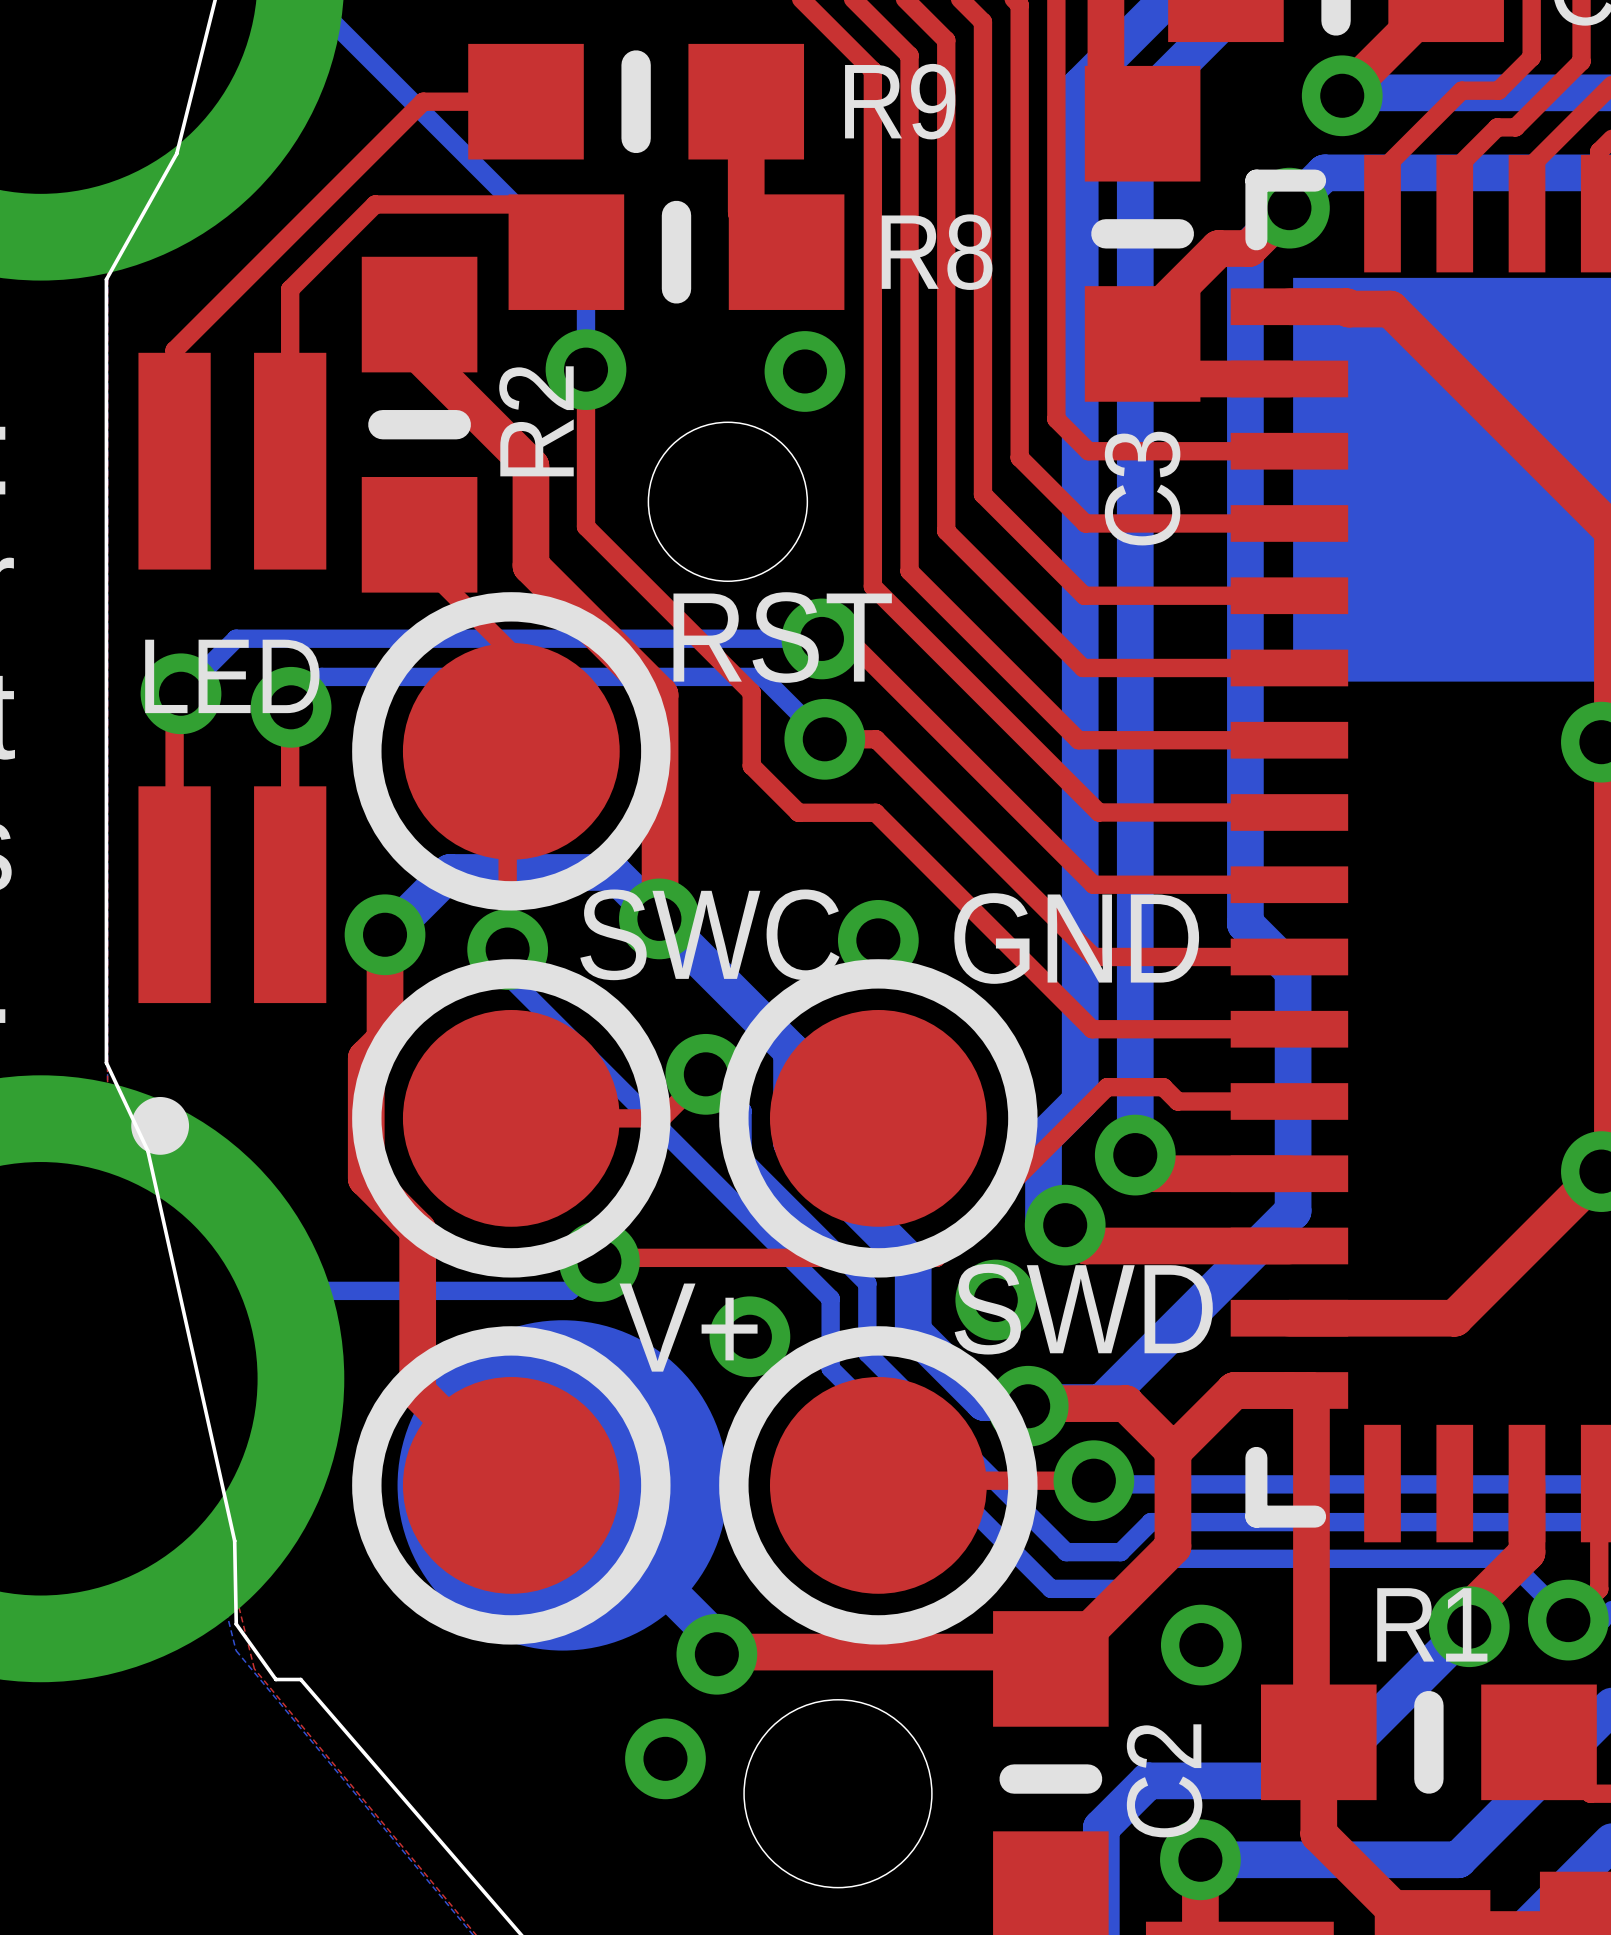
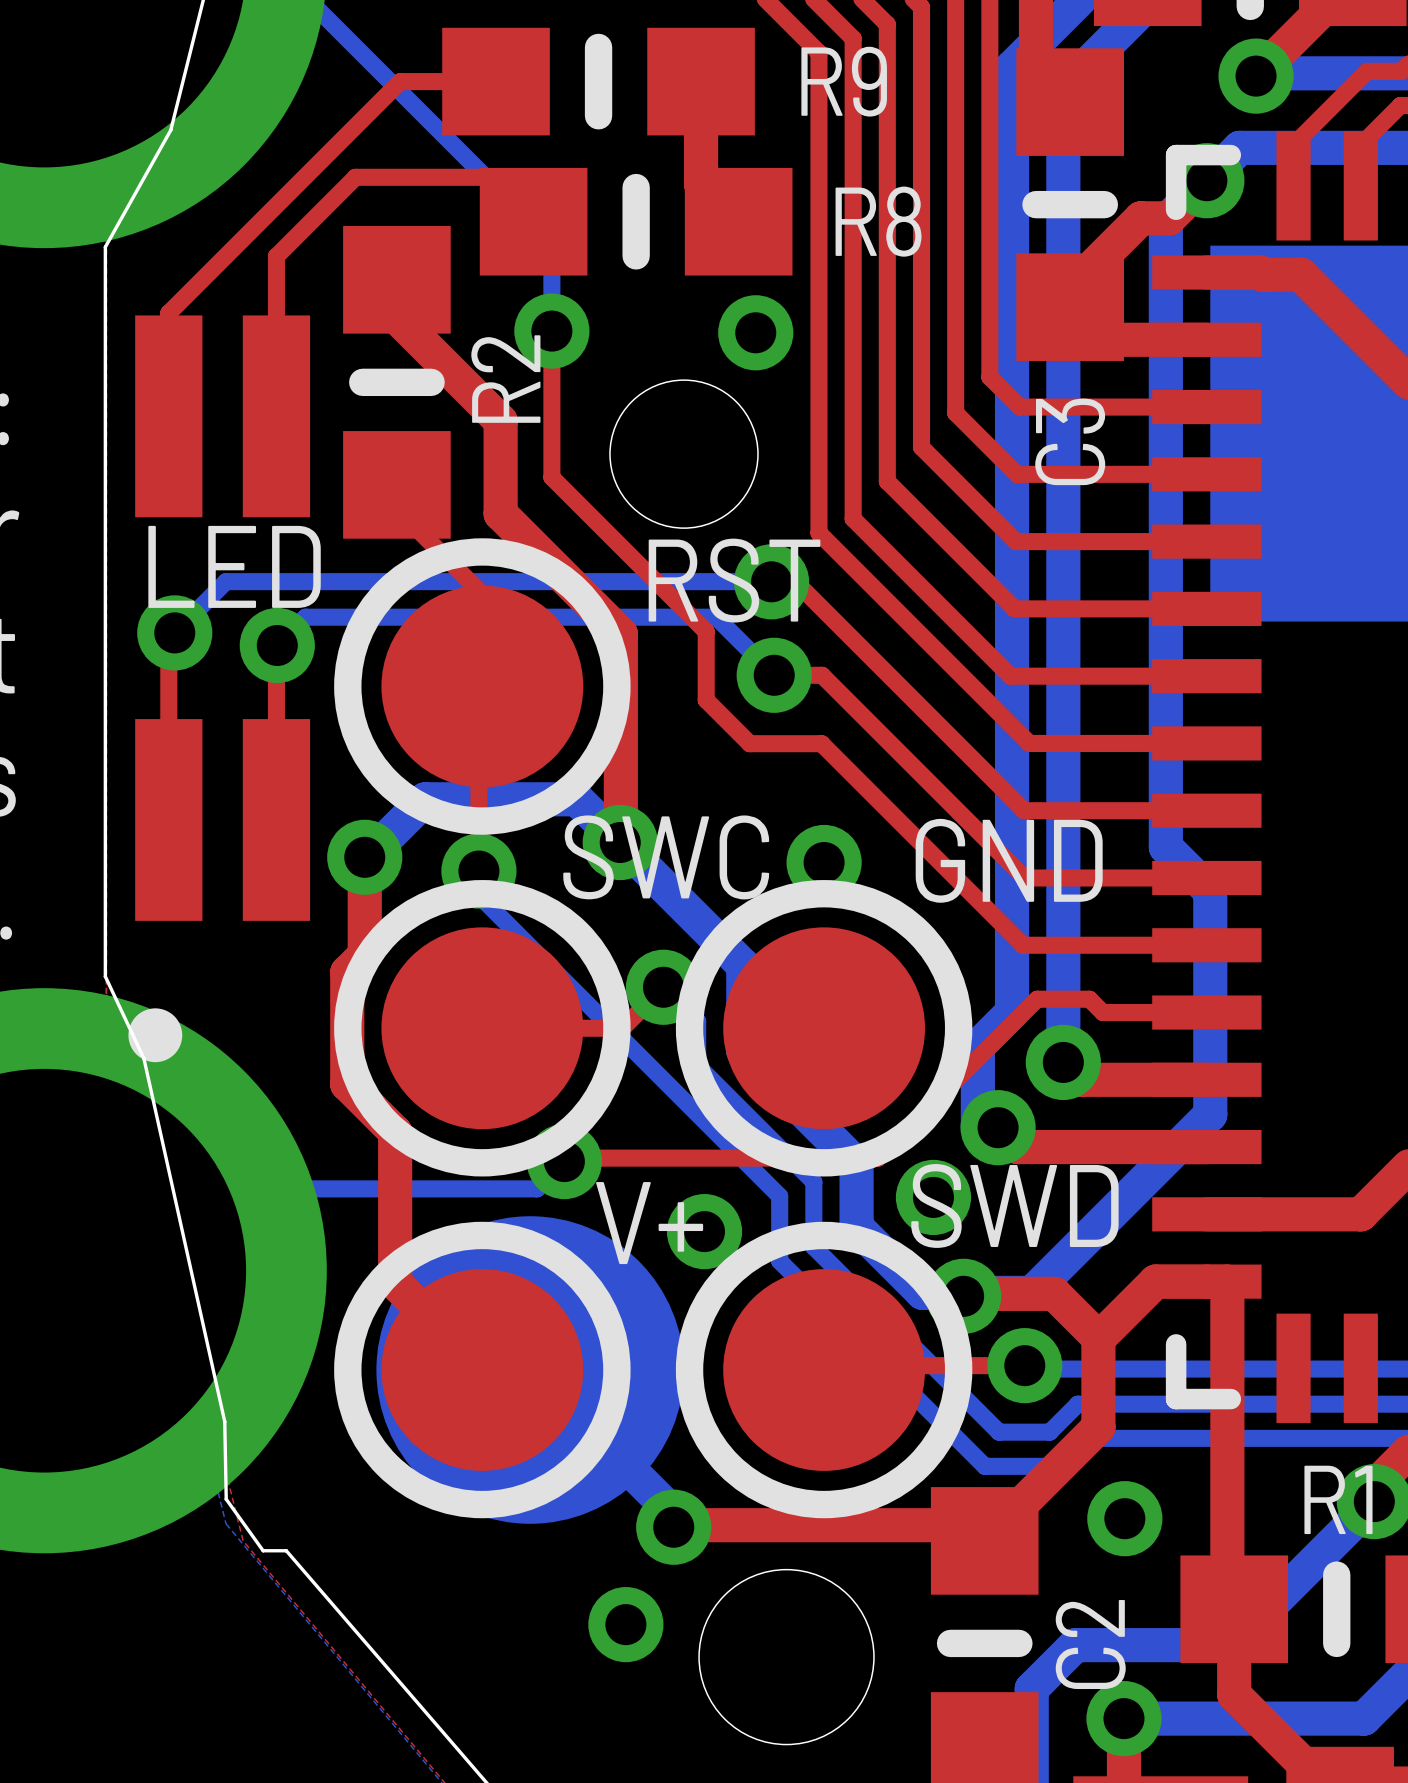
LED name position: LED (232, 676) -> LED (234, 566)

